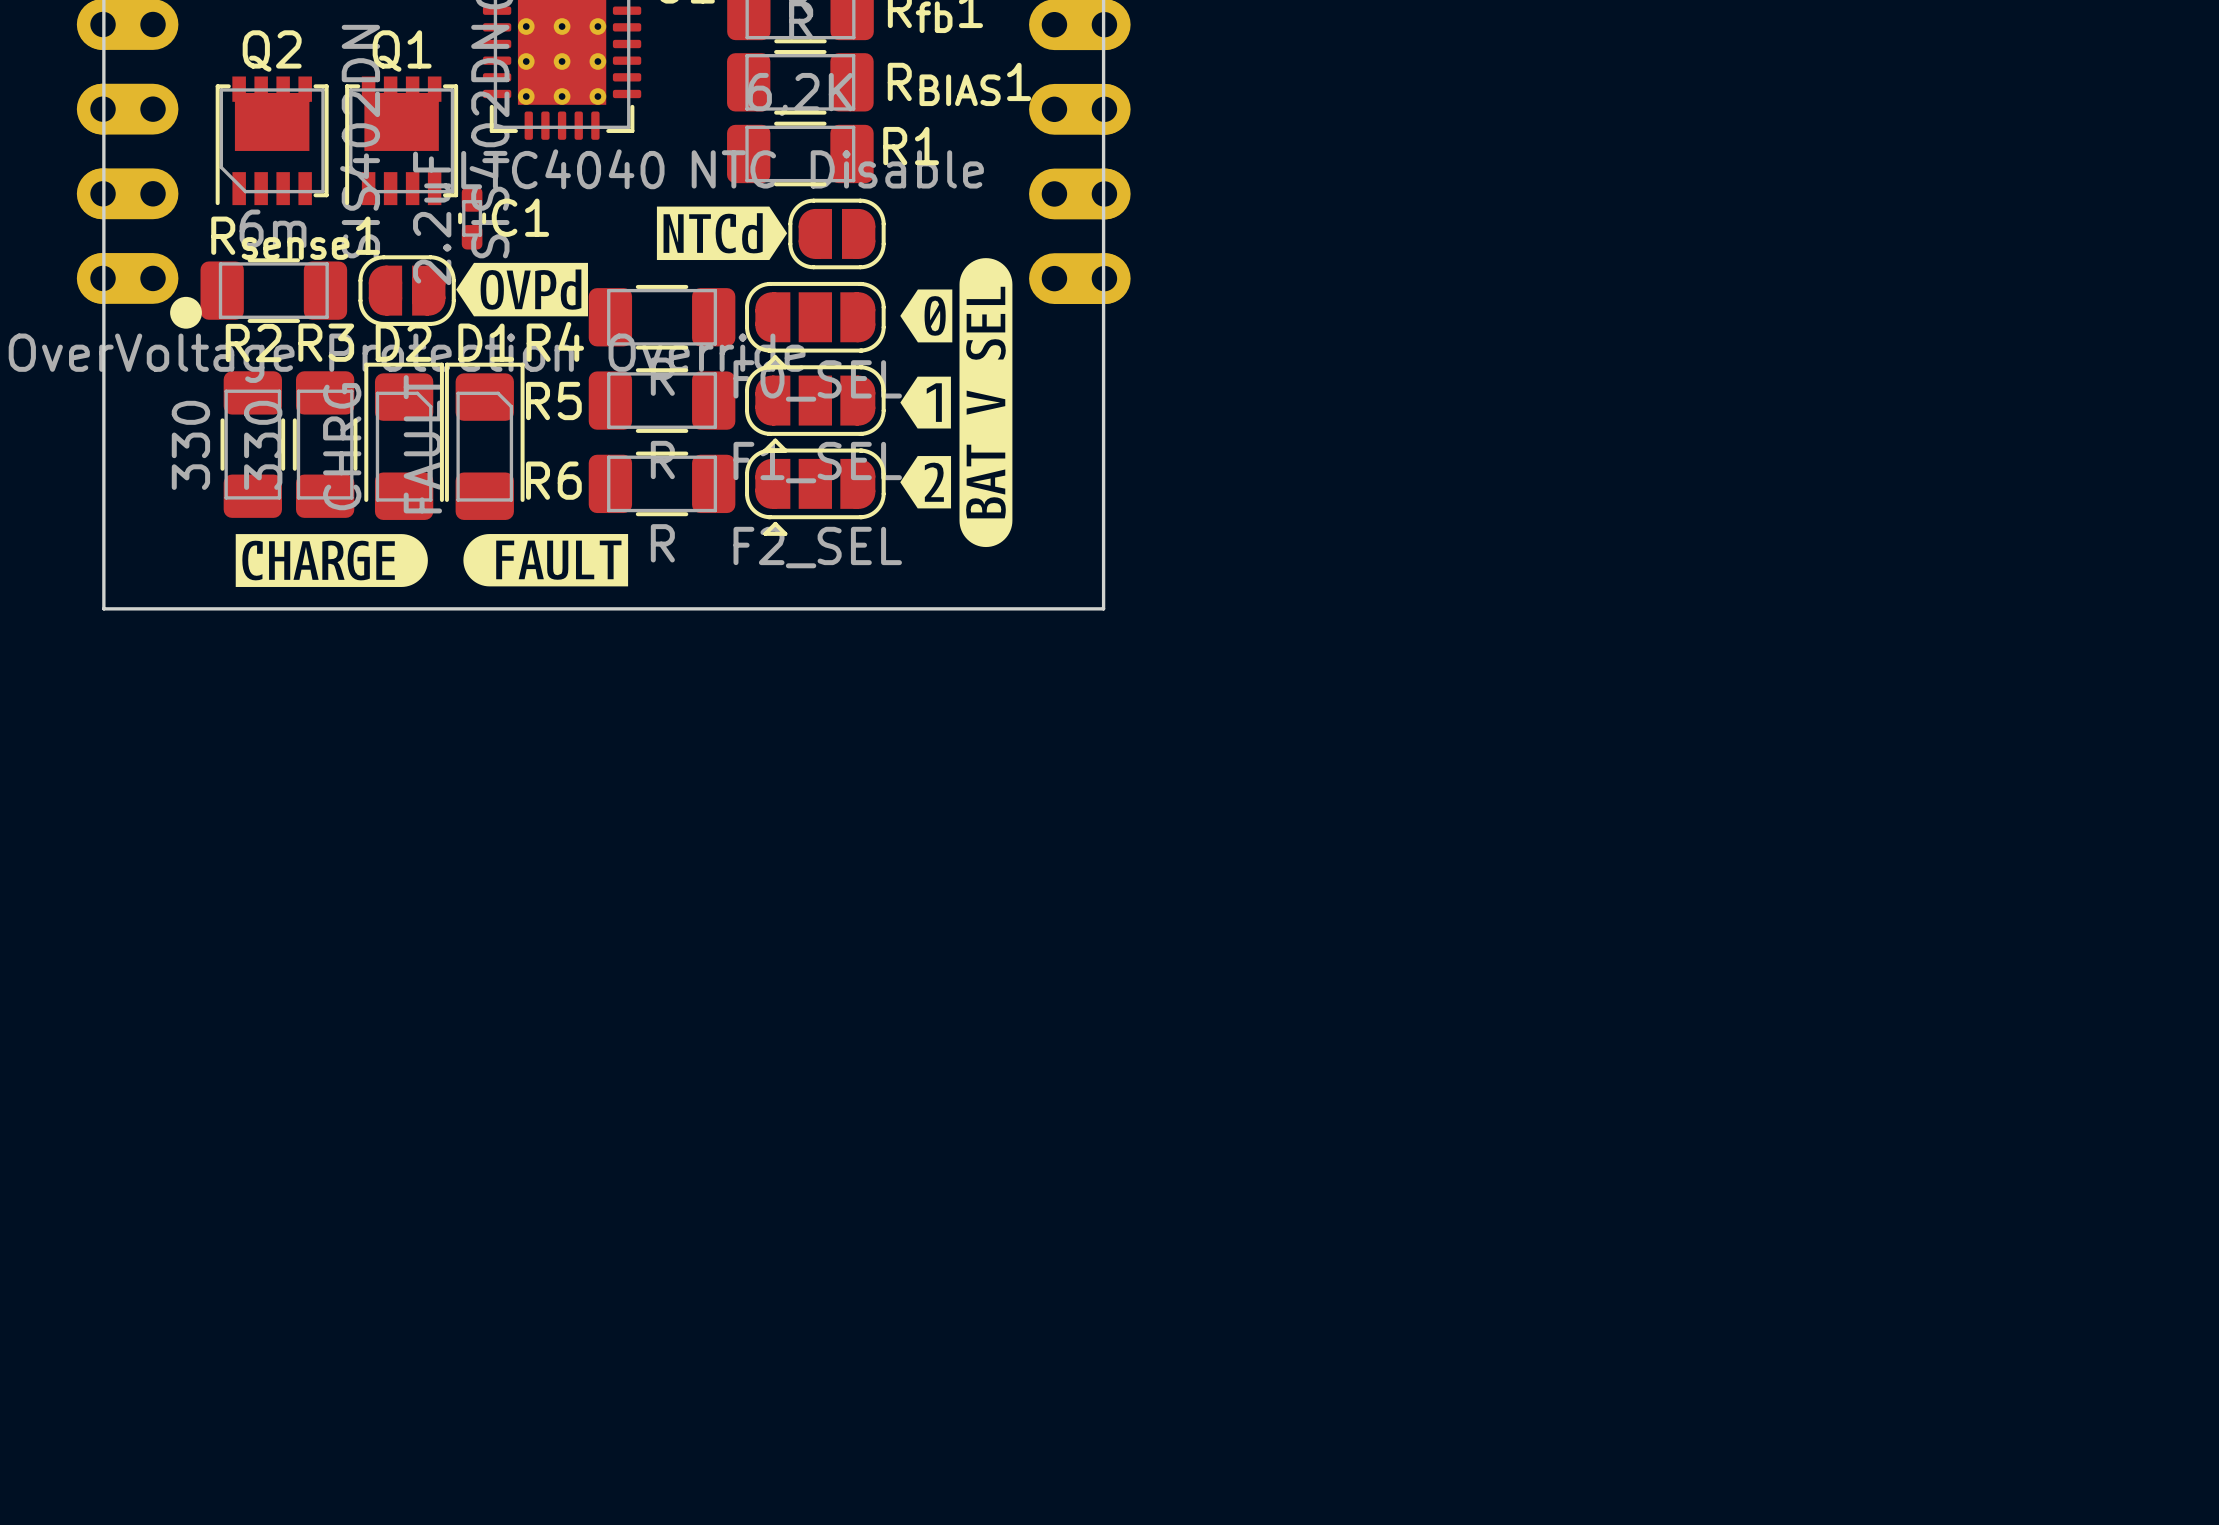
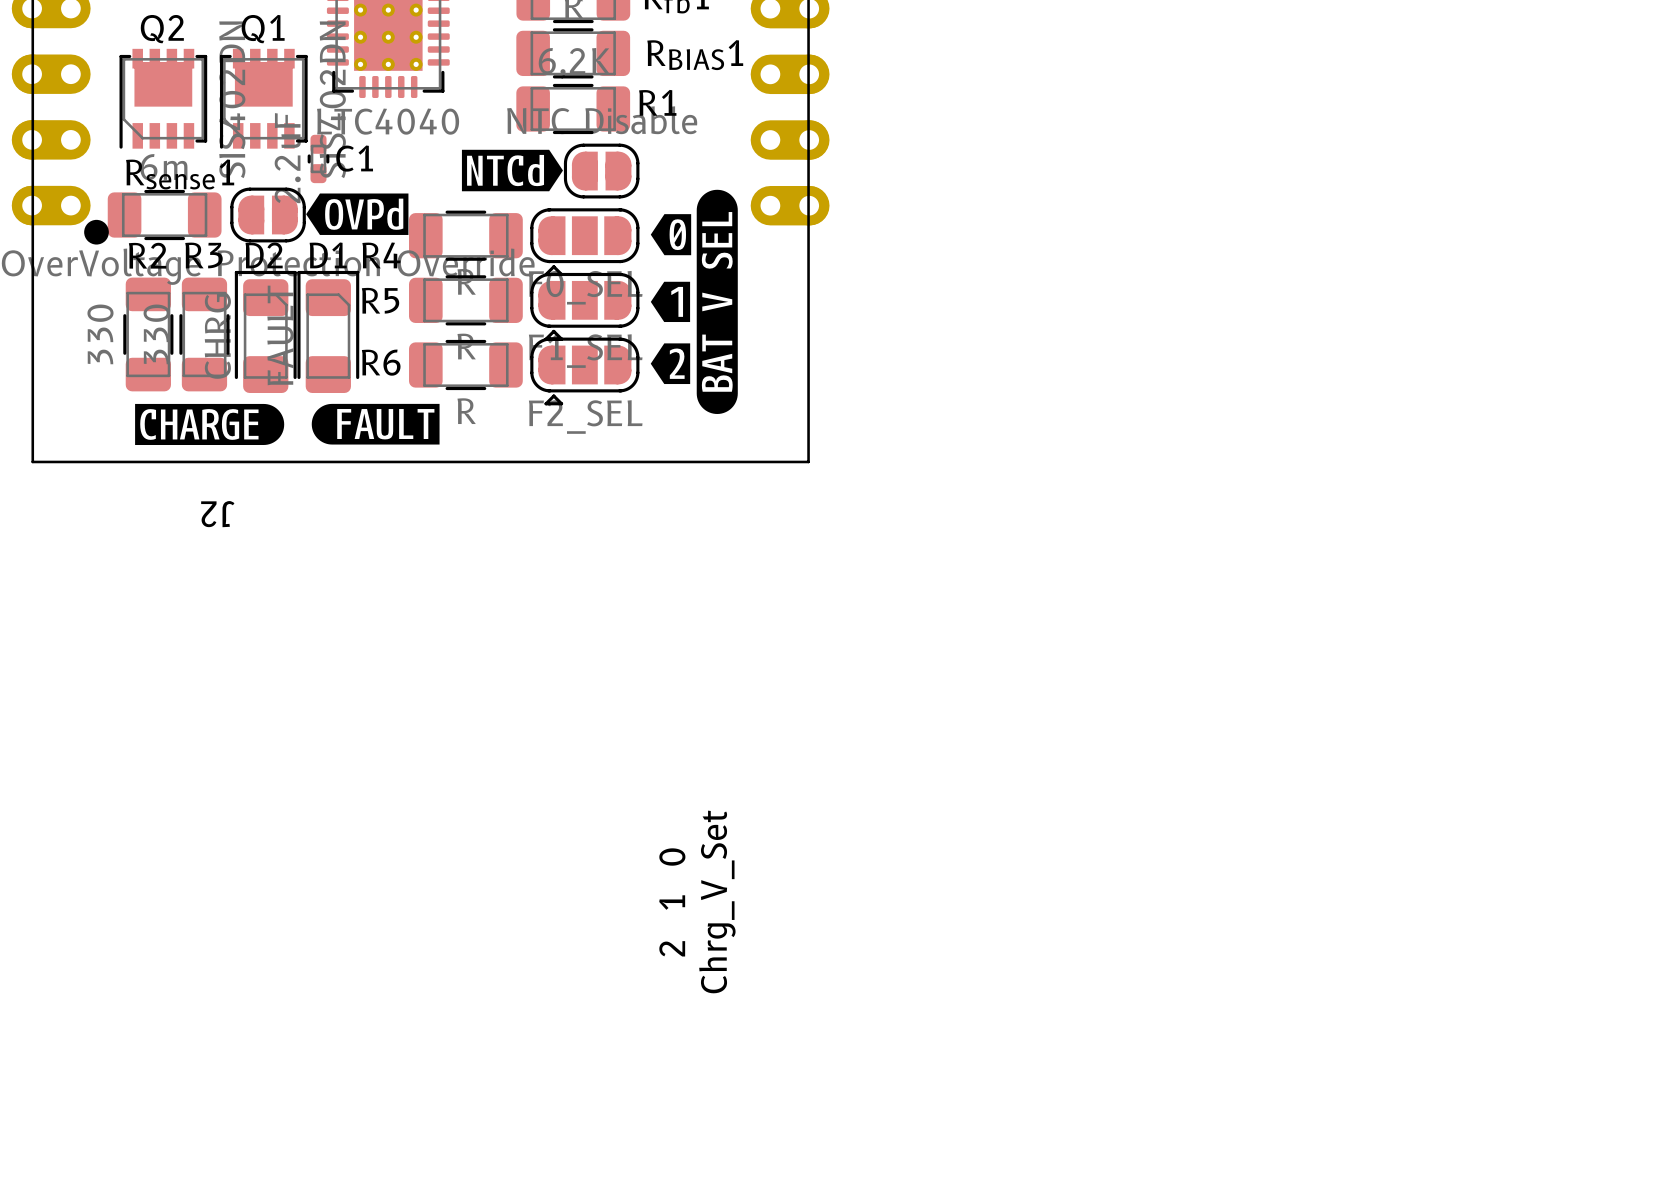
J2 name: none -> J2 (217, 514)
text: none -> Chrg_V_Set (717, 901)
text: none -> 2 1 0 (672, 902)

